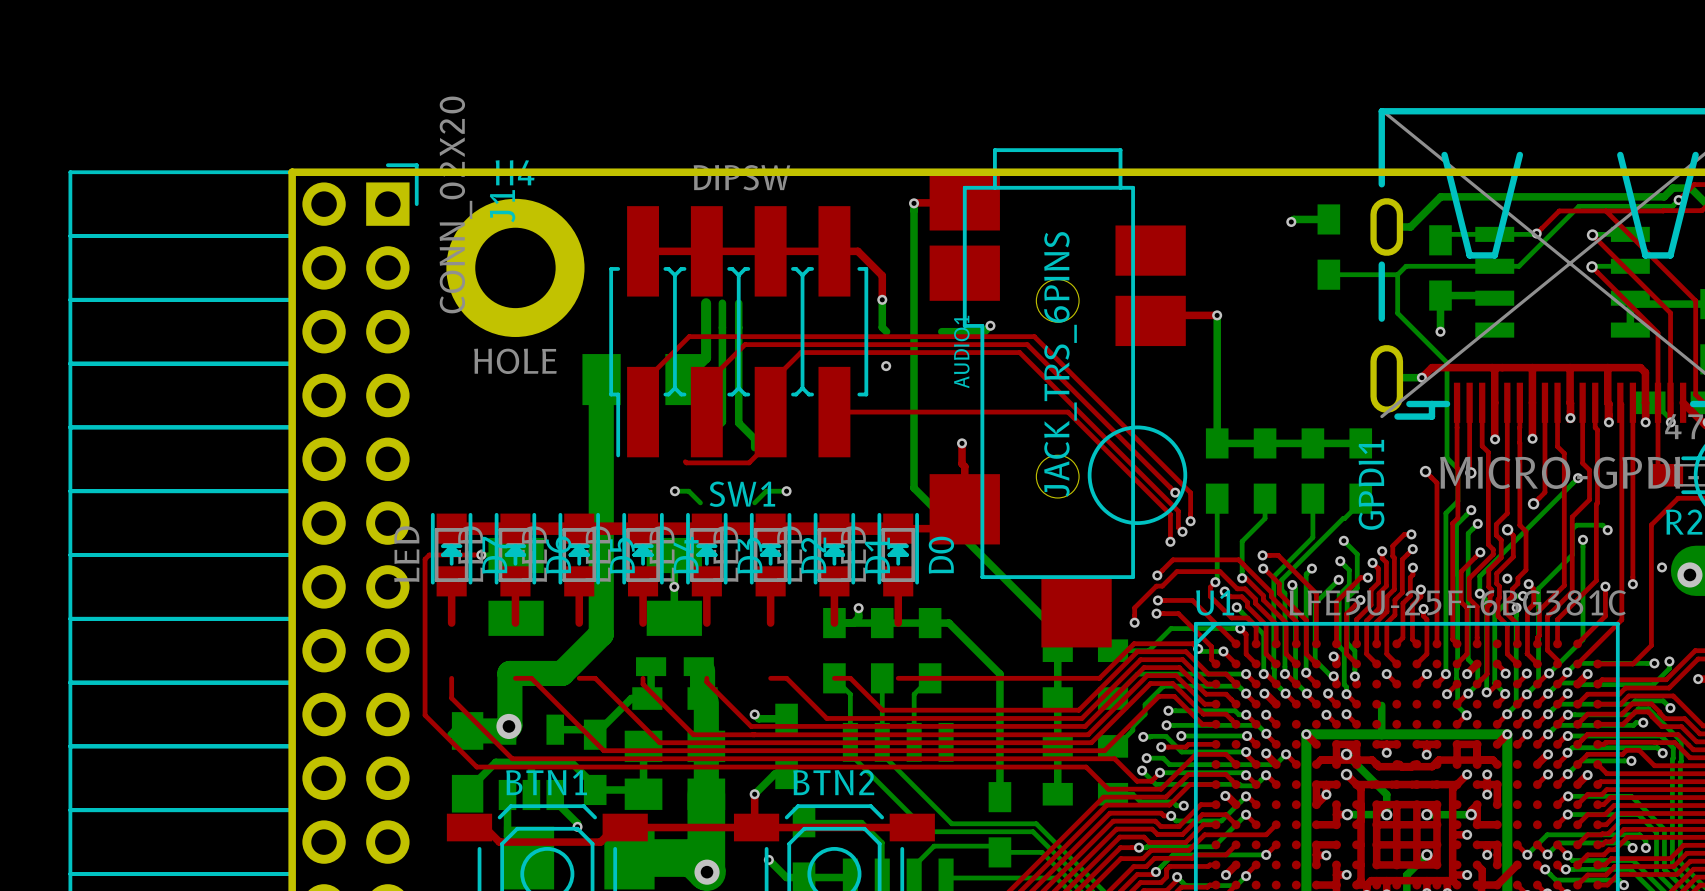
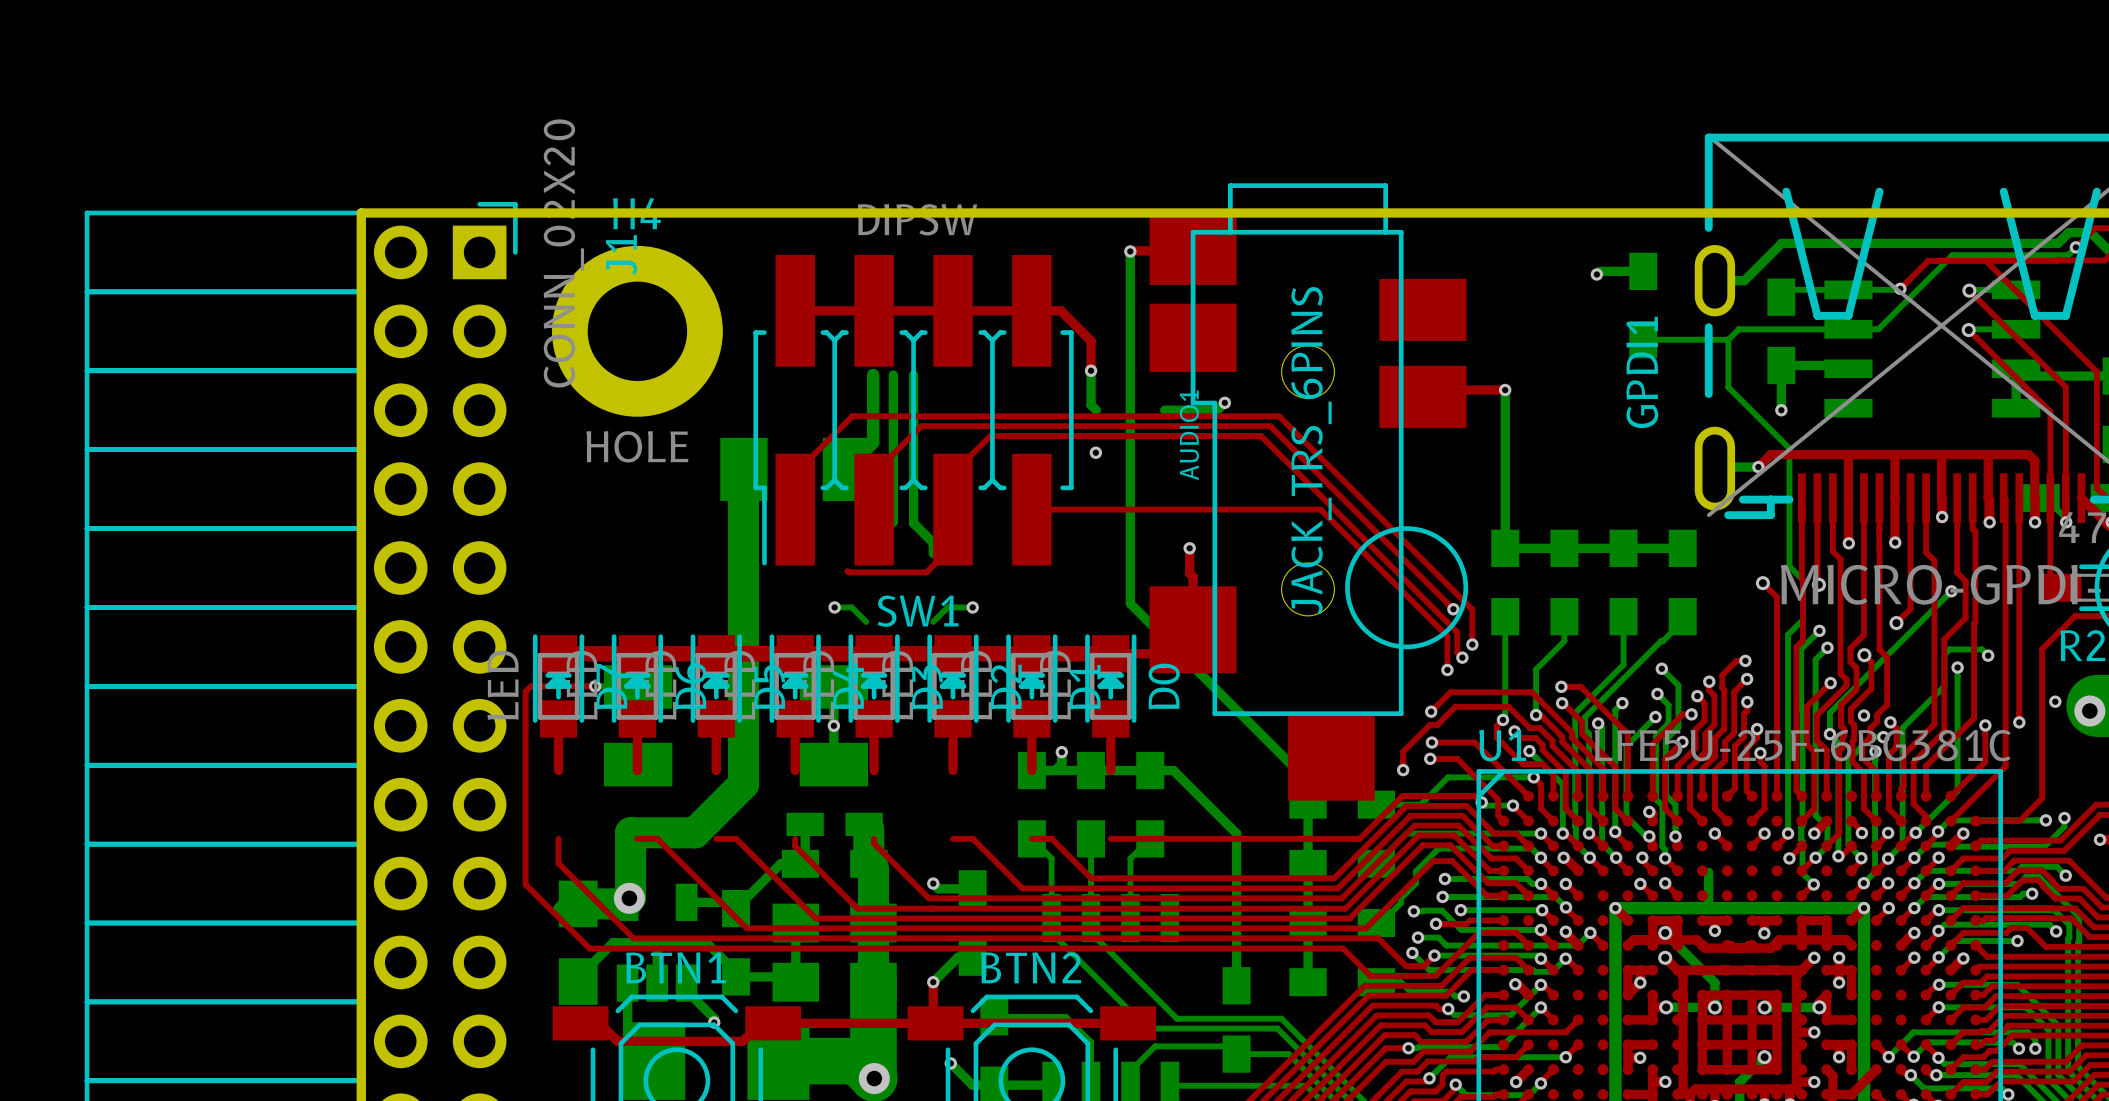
GPDI1 name position: GPDI1 (1371, 484) -> GPDI1 (1642, 372)

